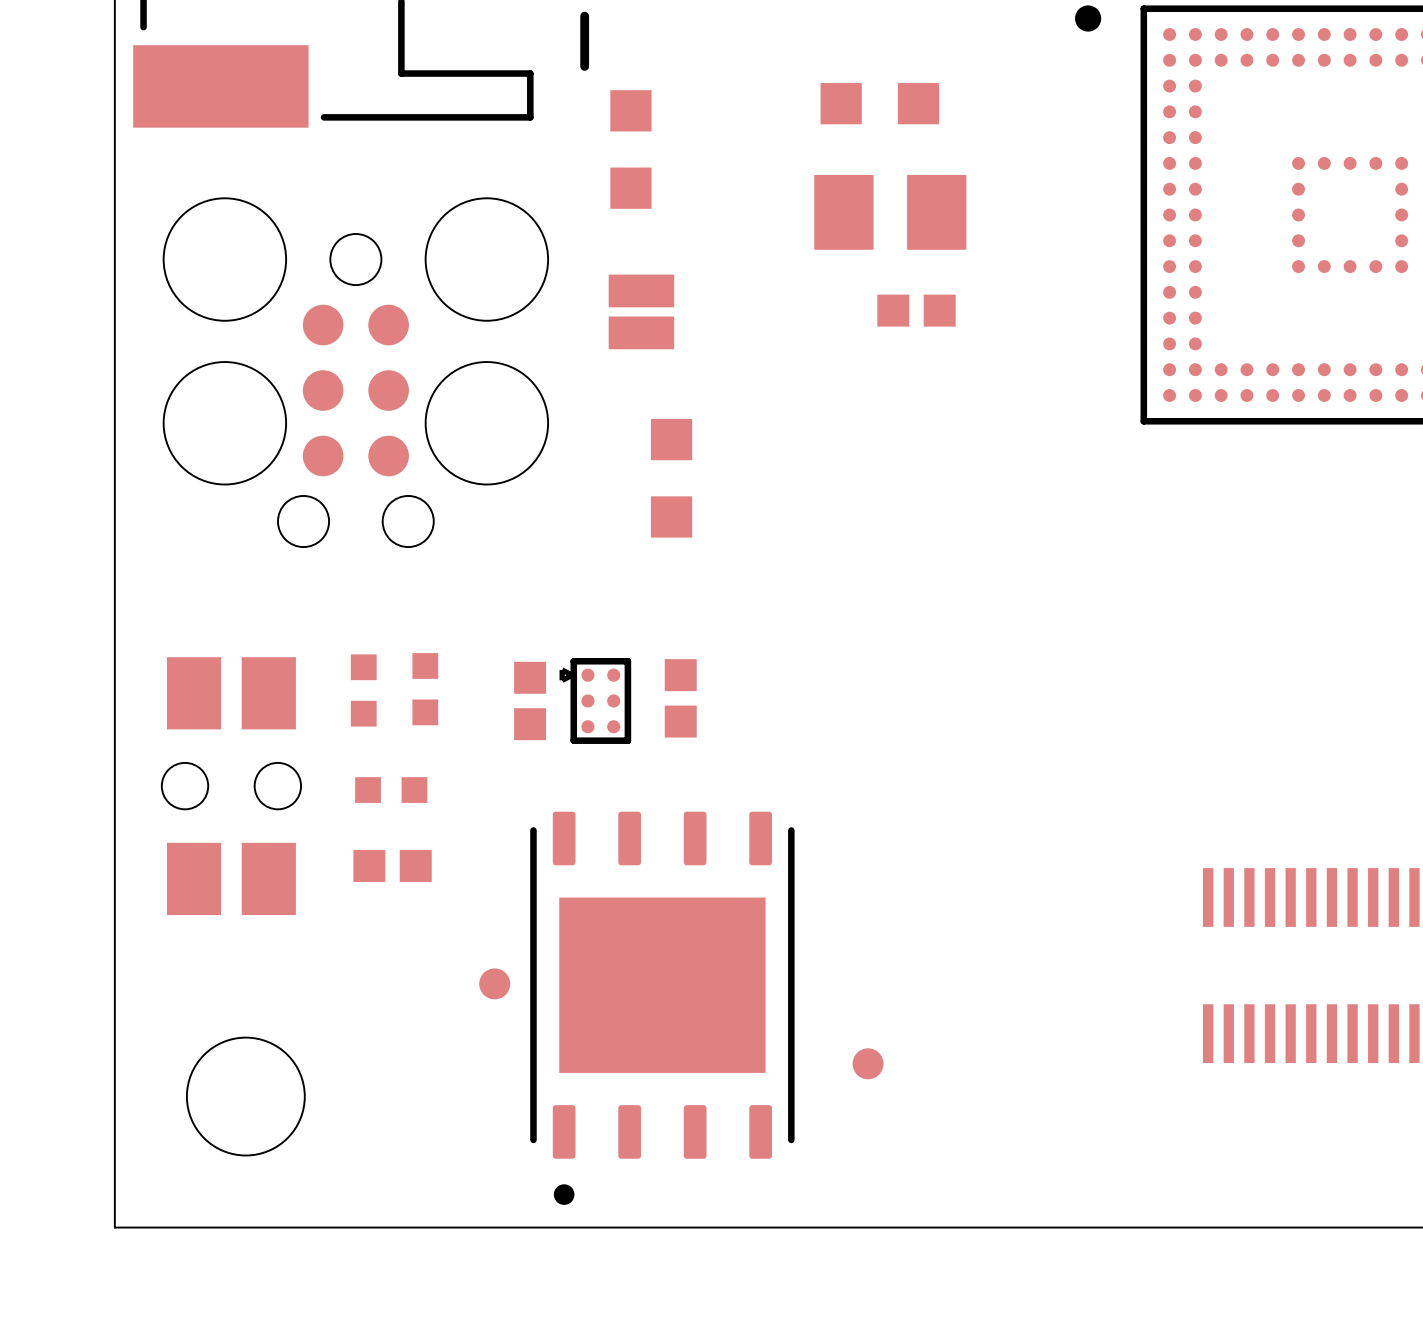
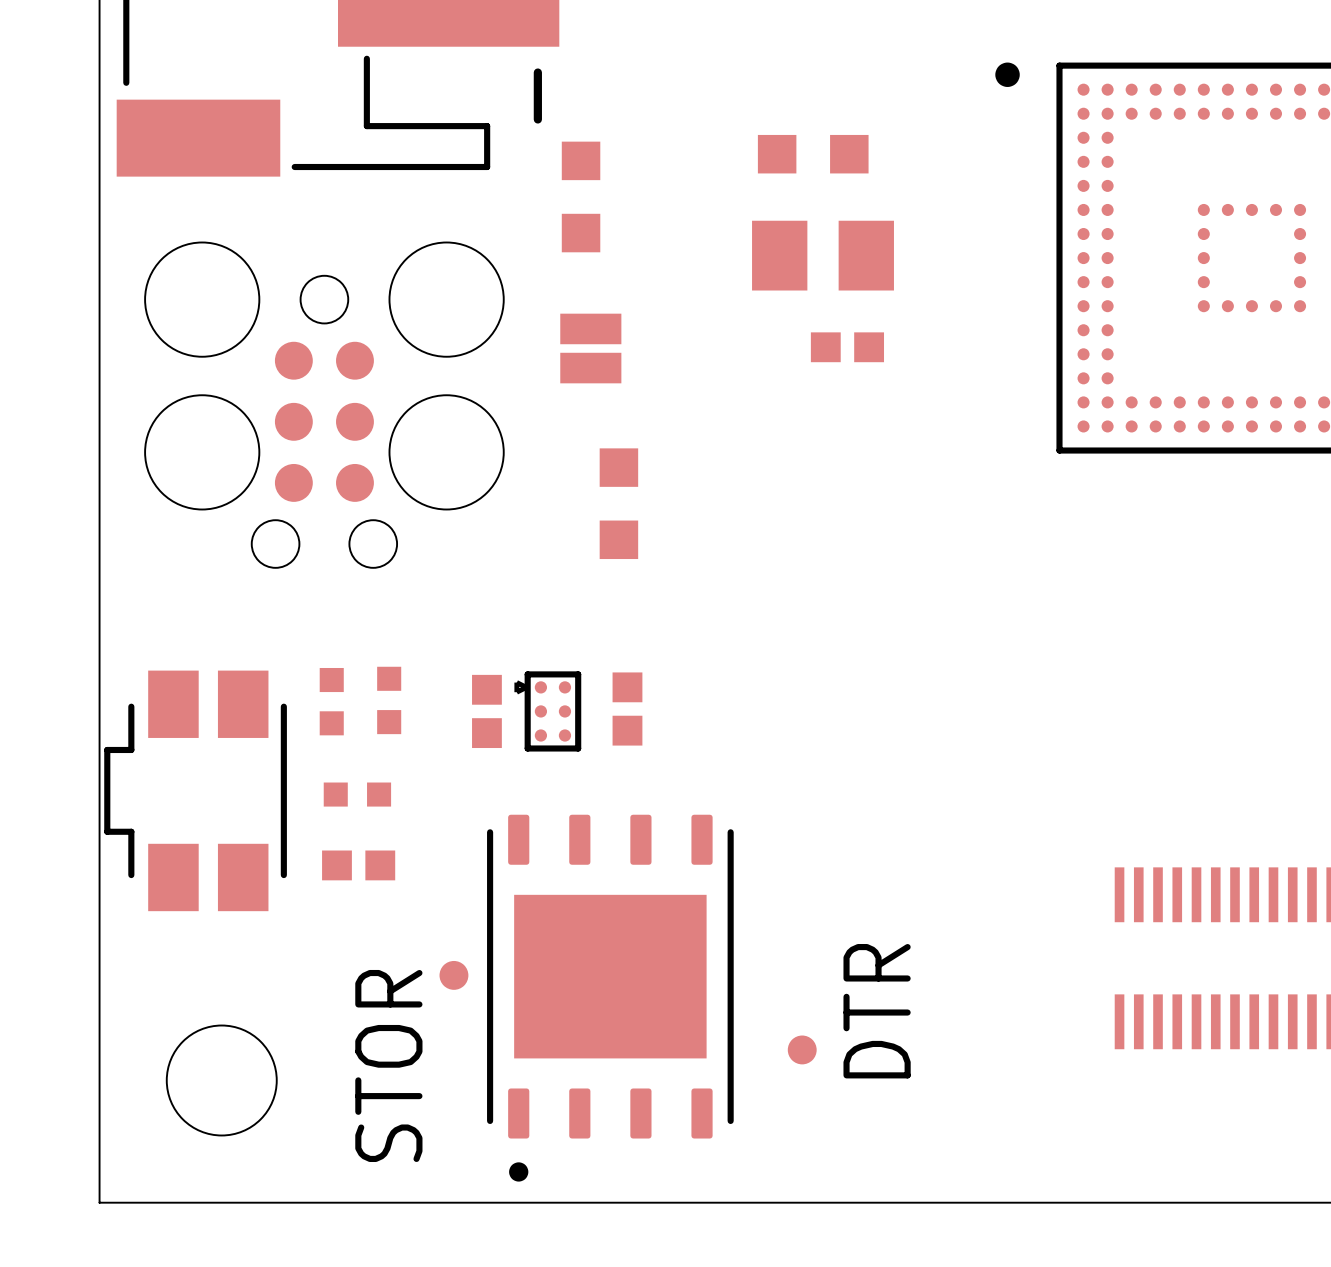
part footprint: [161, 657, 302, 916] -> [104, 670, 287, 912]
DTR name: none -> DTR (877, 1011)
STOR name: none -> STOR (388, 1065)

